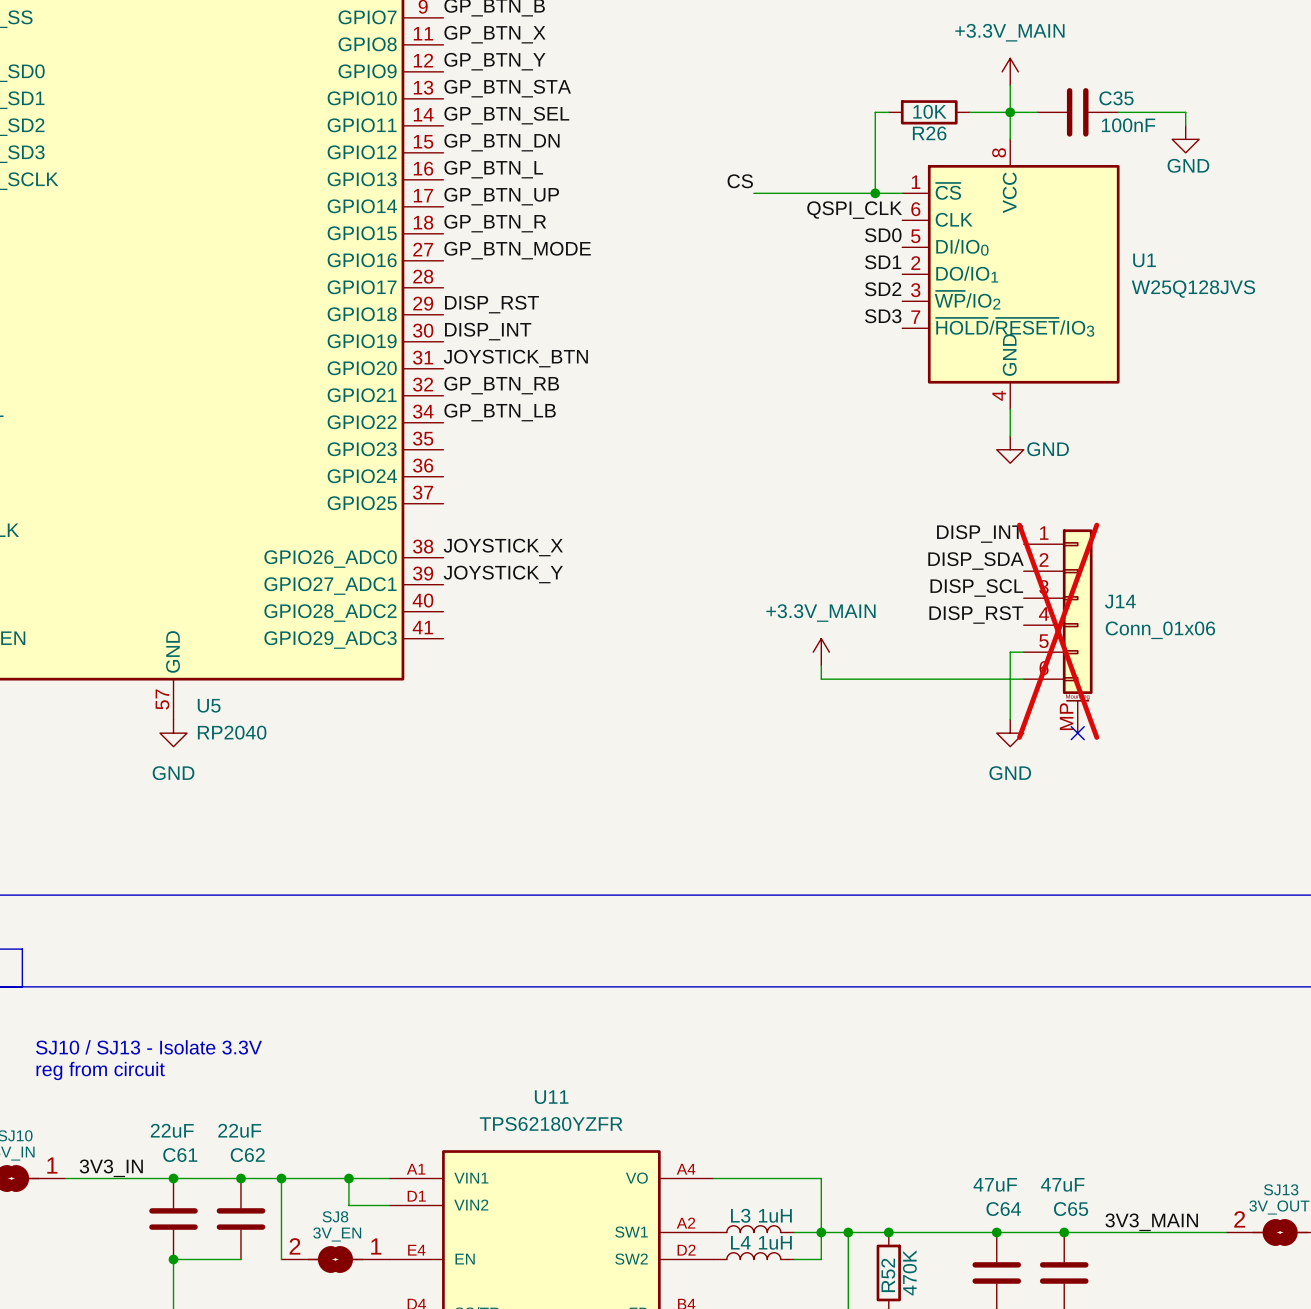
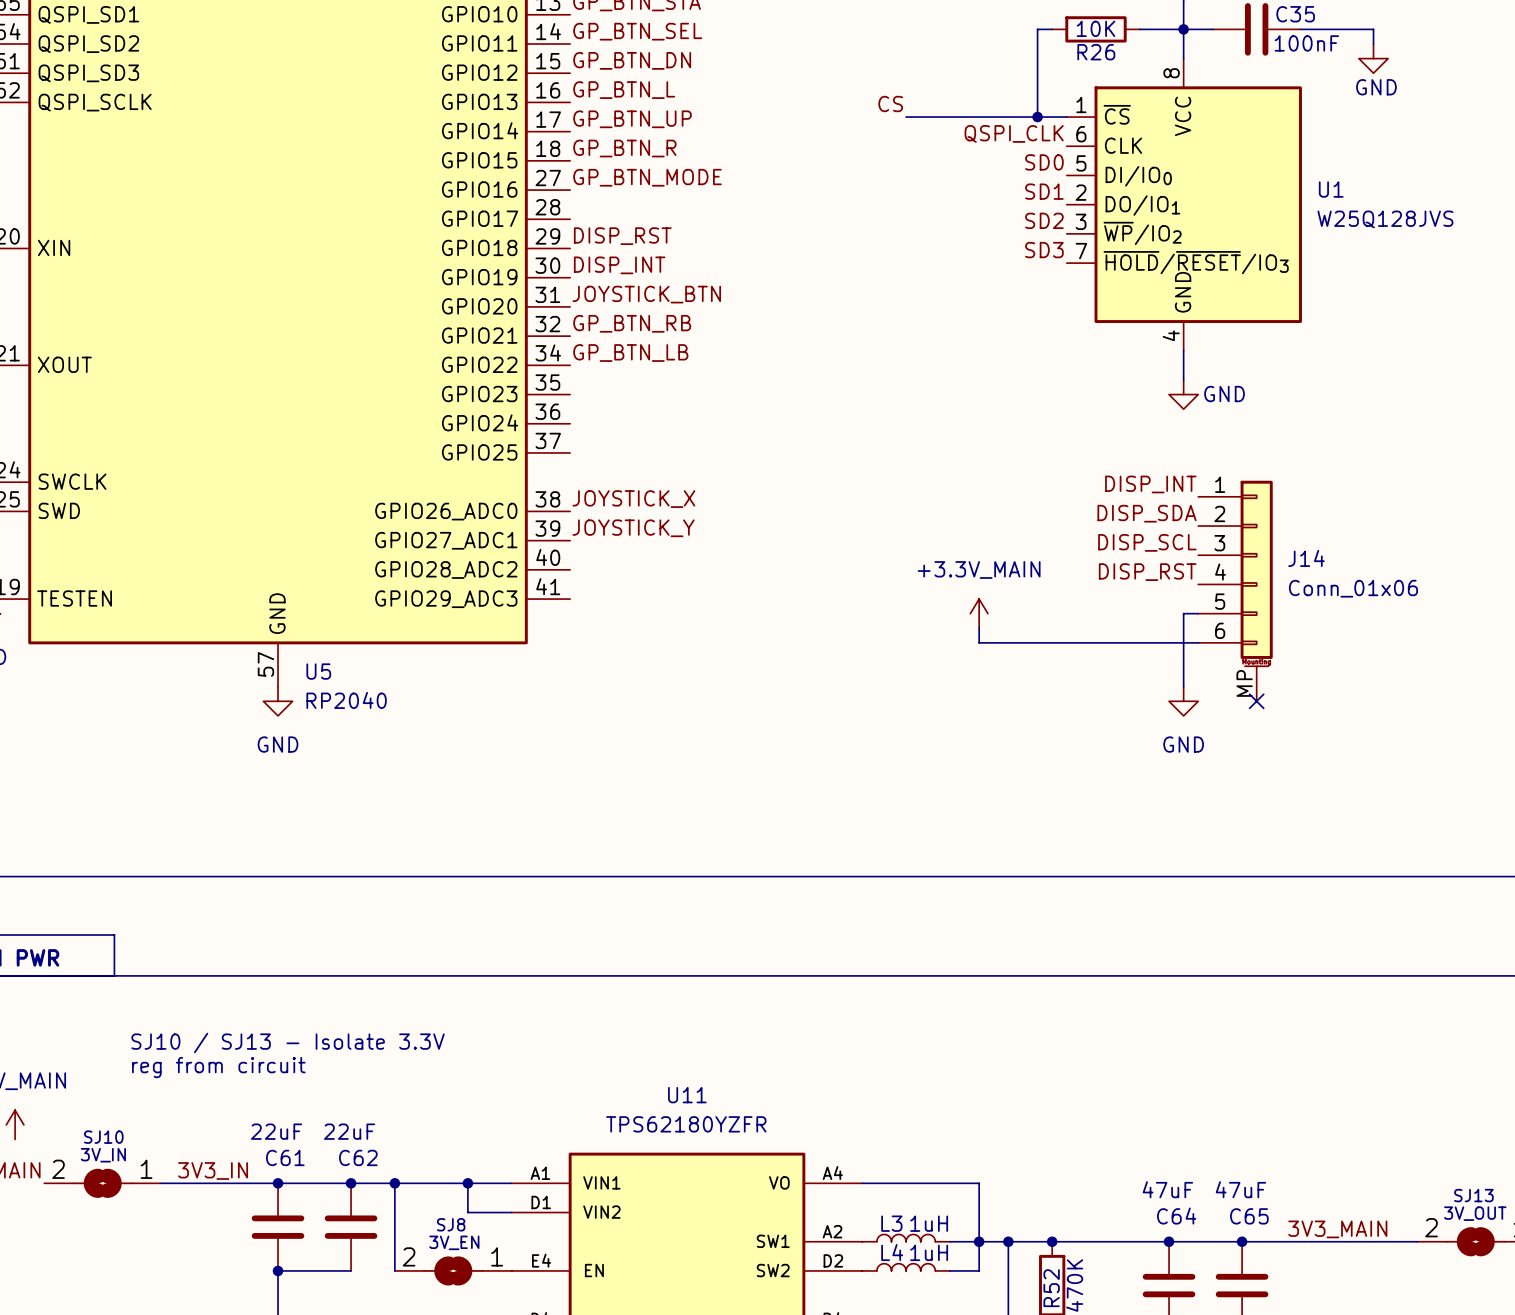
J14 do-not-place cross: (1058, 631) -> none

